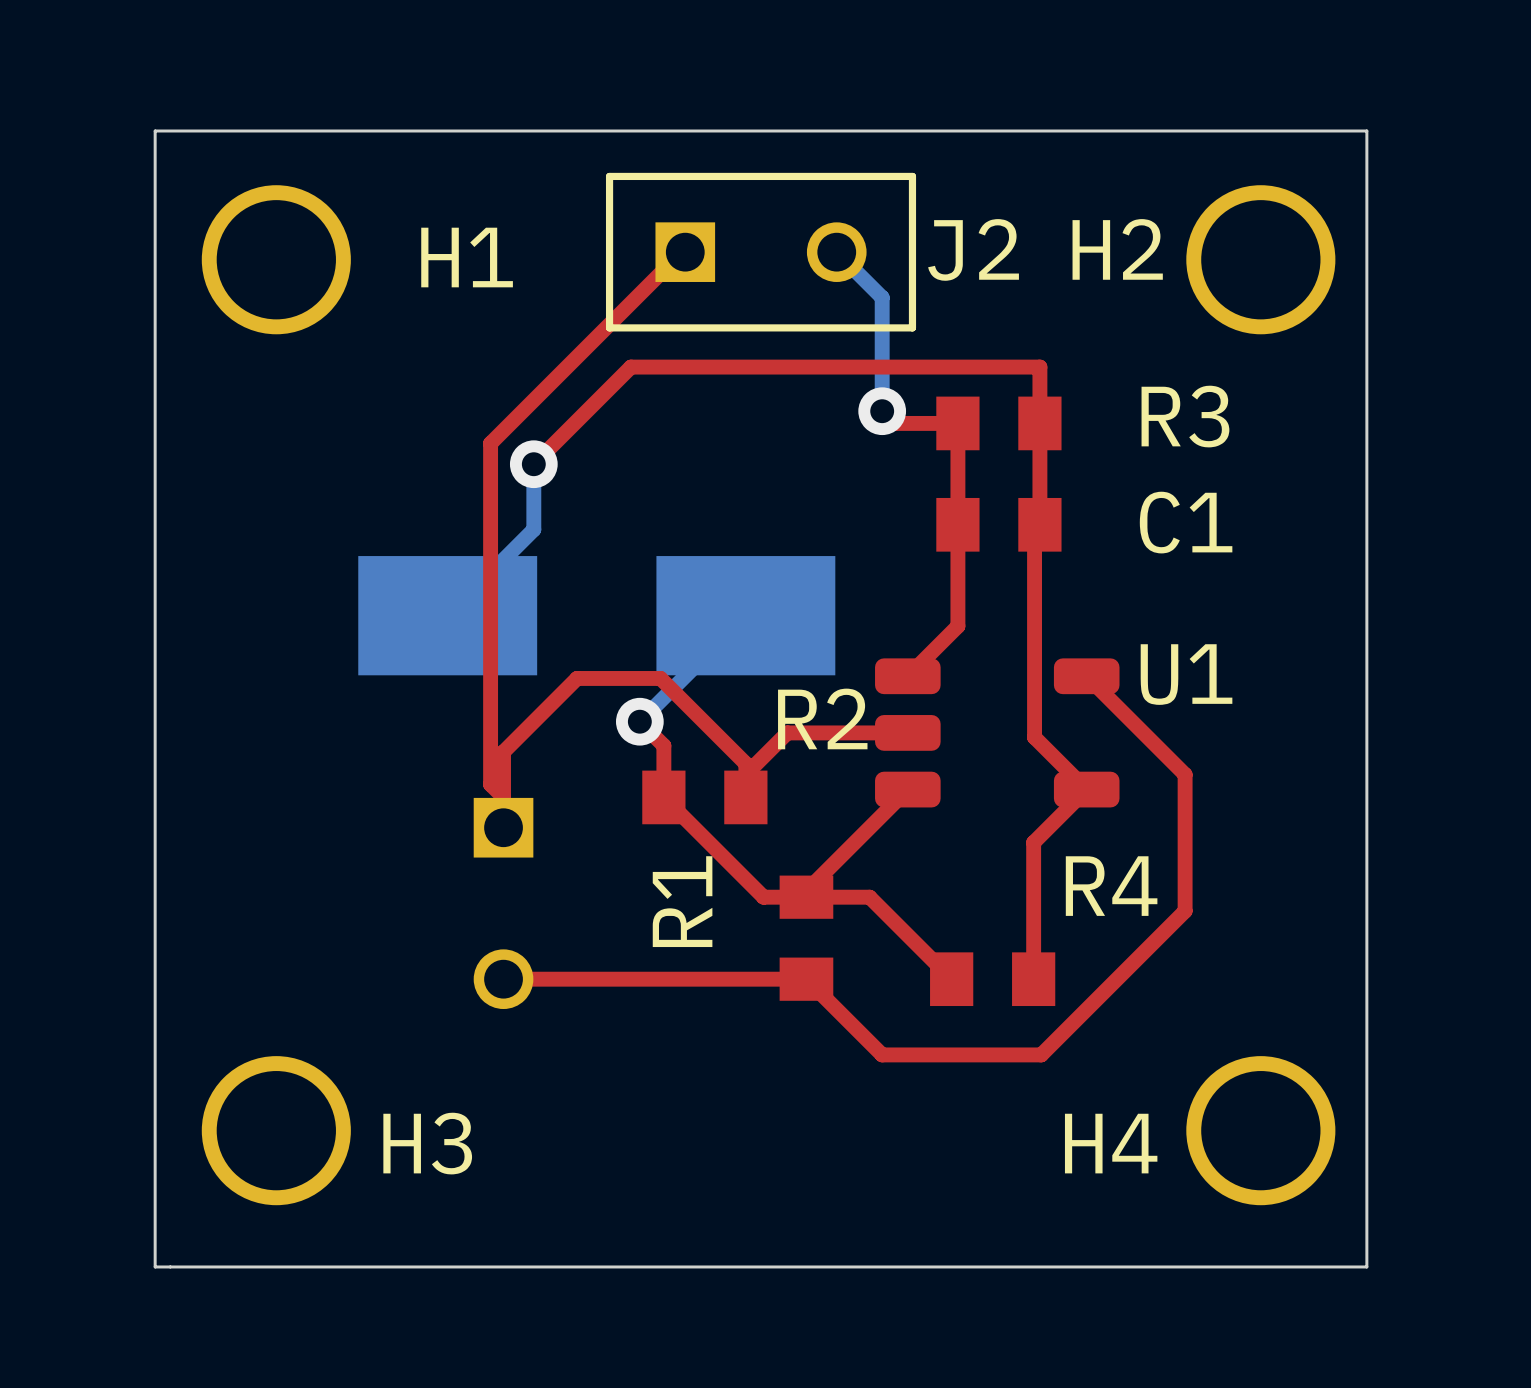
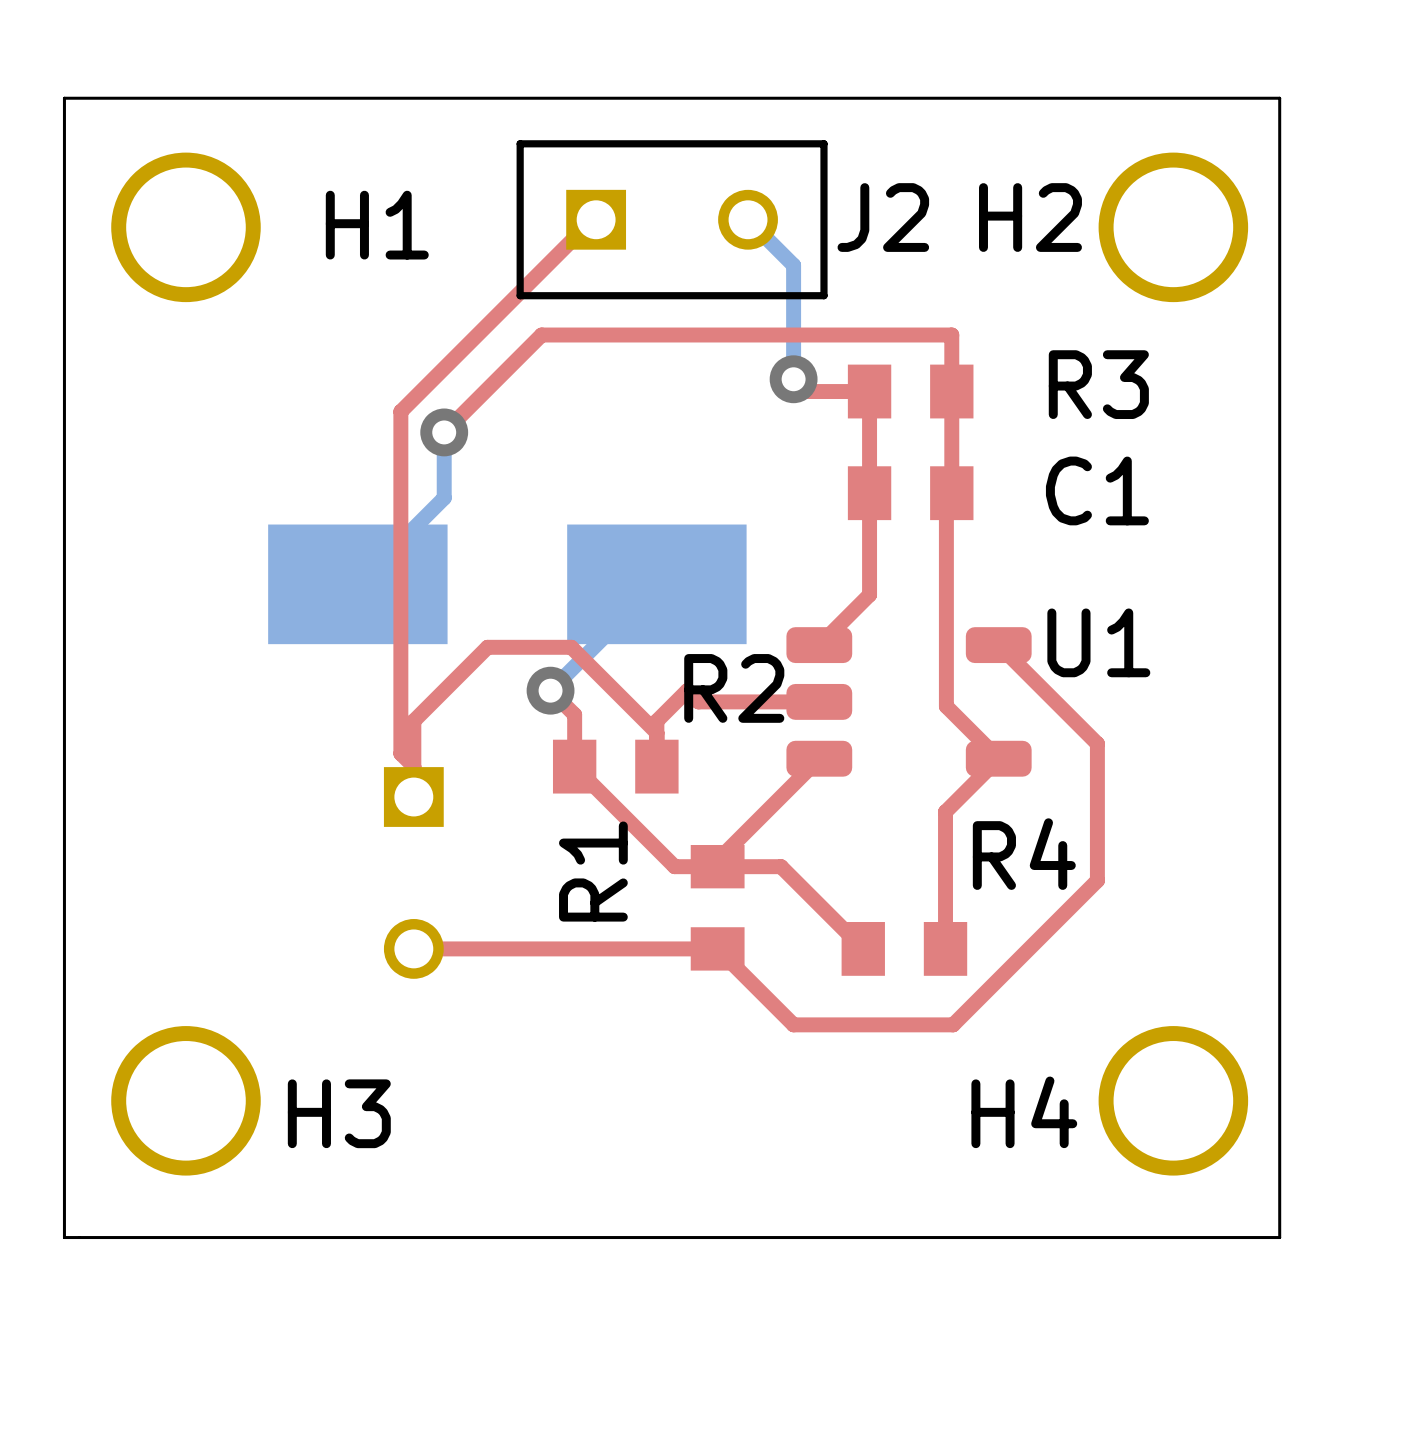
top track: (787, 732) (745, 774) -> (698, 701) (687, 690) (656, 721) (656, 732)

